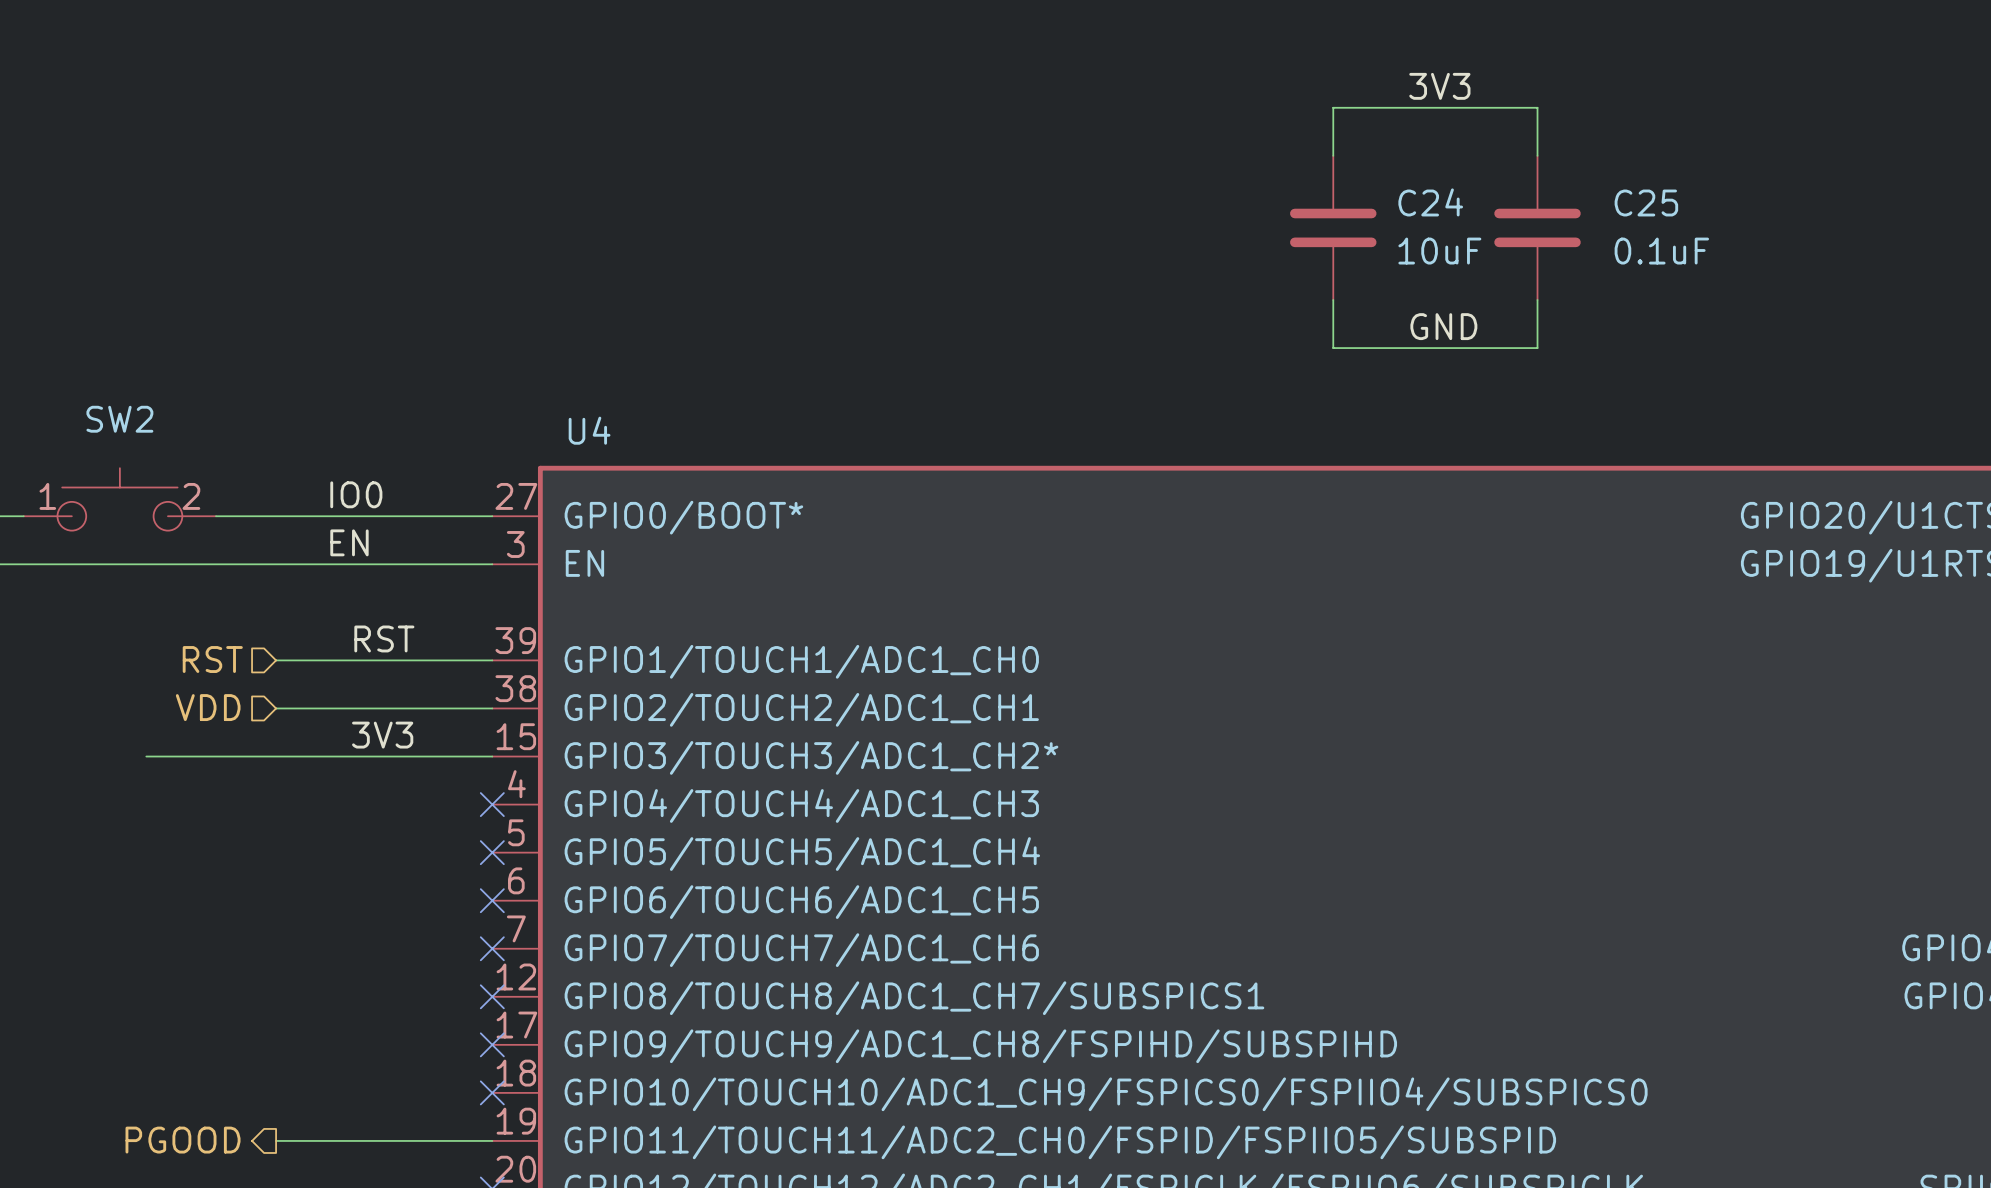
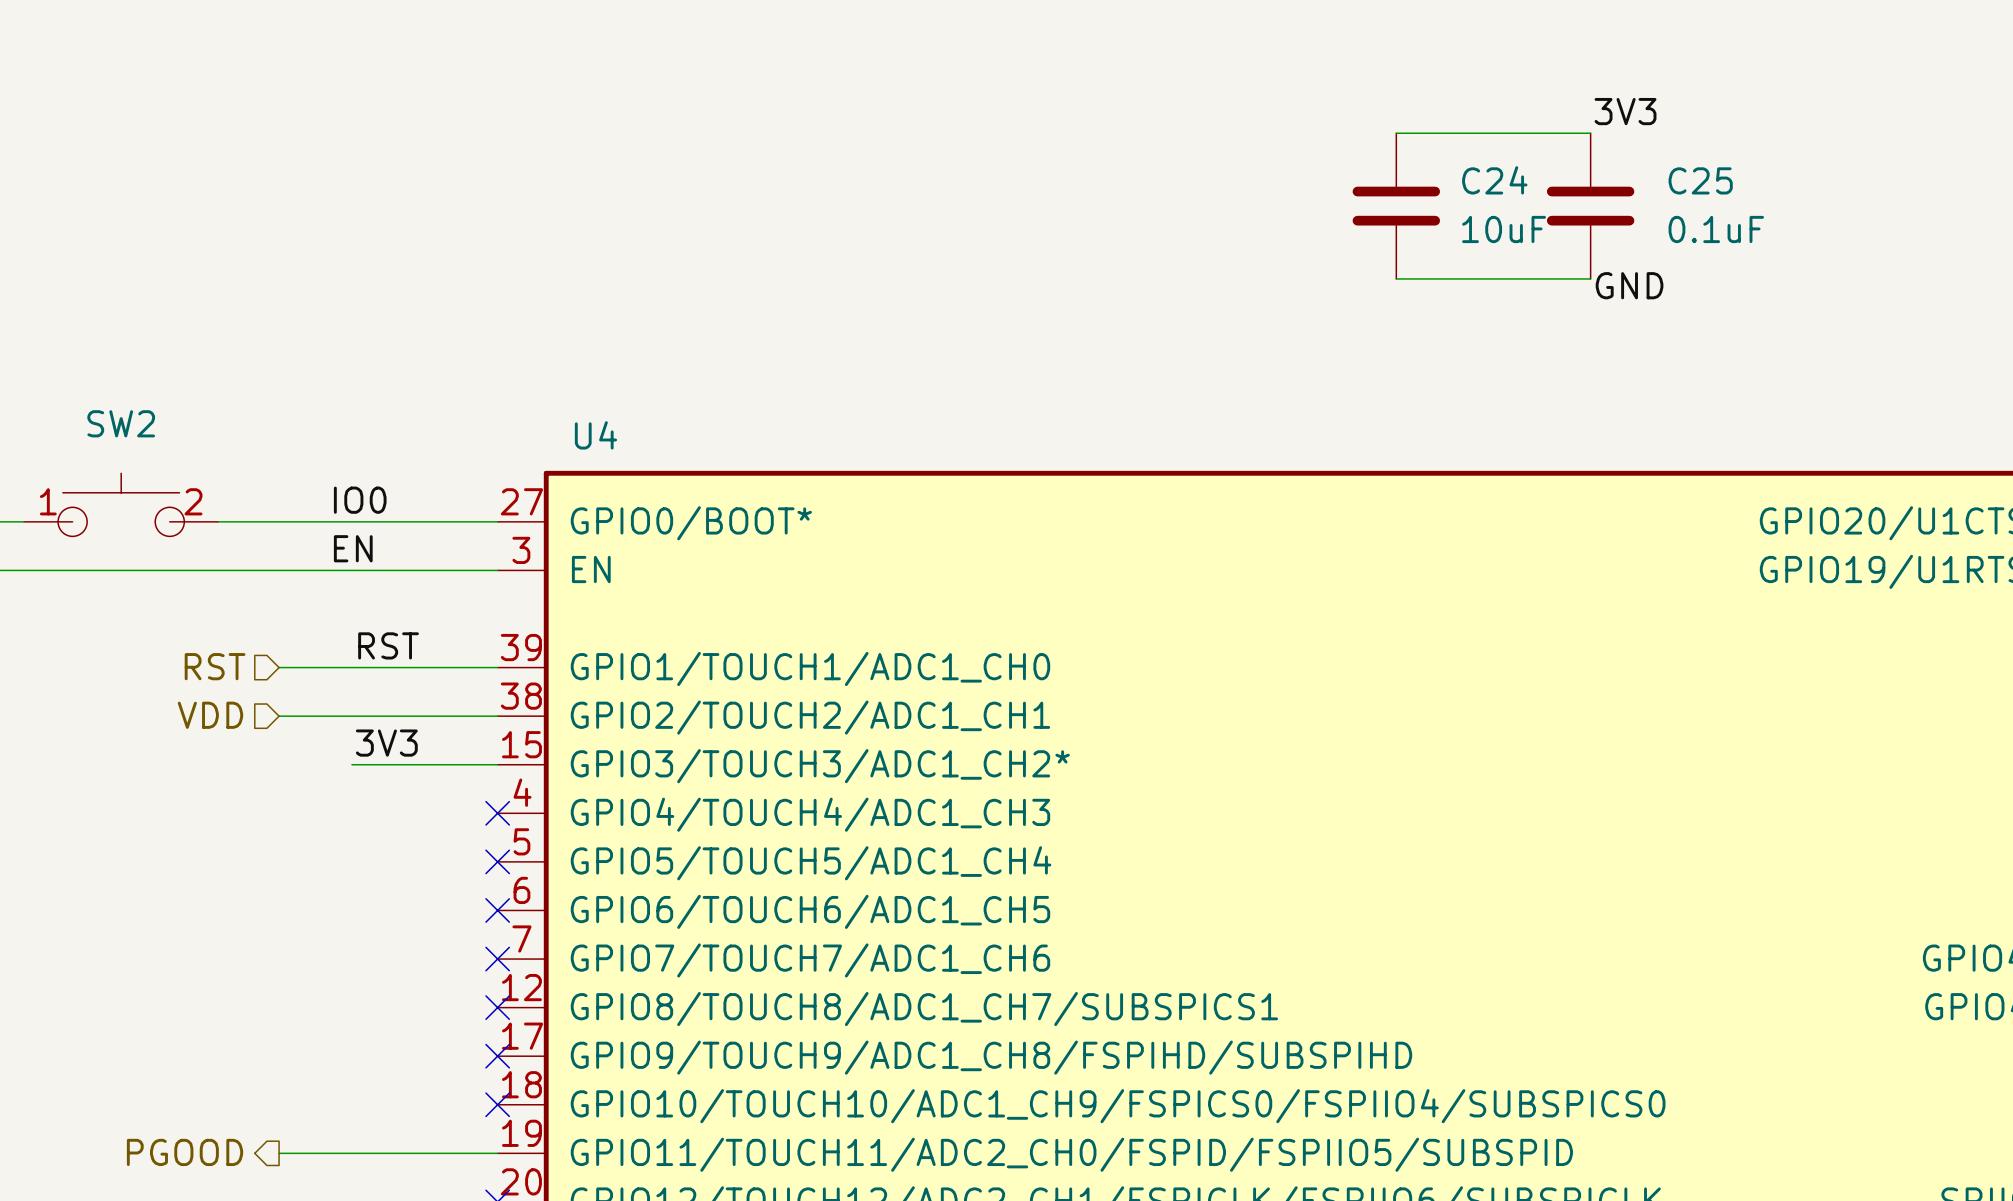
label position: 3V3 (1439, 86) -> 3V3 (1625, 111)
wire: none -> (1396, 133) (1590, 133)
wire: (1333, 155) (1333, 107) (1537, 107) (1537, 155) -> none
C24 position: (1333, 227) -> (1396, 206)
C25 position: (1537, 227) -> (1590, 206)
wire: none -> (1396, 278) (1590, 278)
wire: (1333, 300) (1333, 348) (1537, 348) (1537, 300) -> none
label position: GND (1443, 326) -> GND (1629, 285)
wire: (146, 756) (348, 756) -> none

